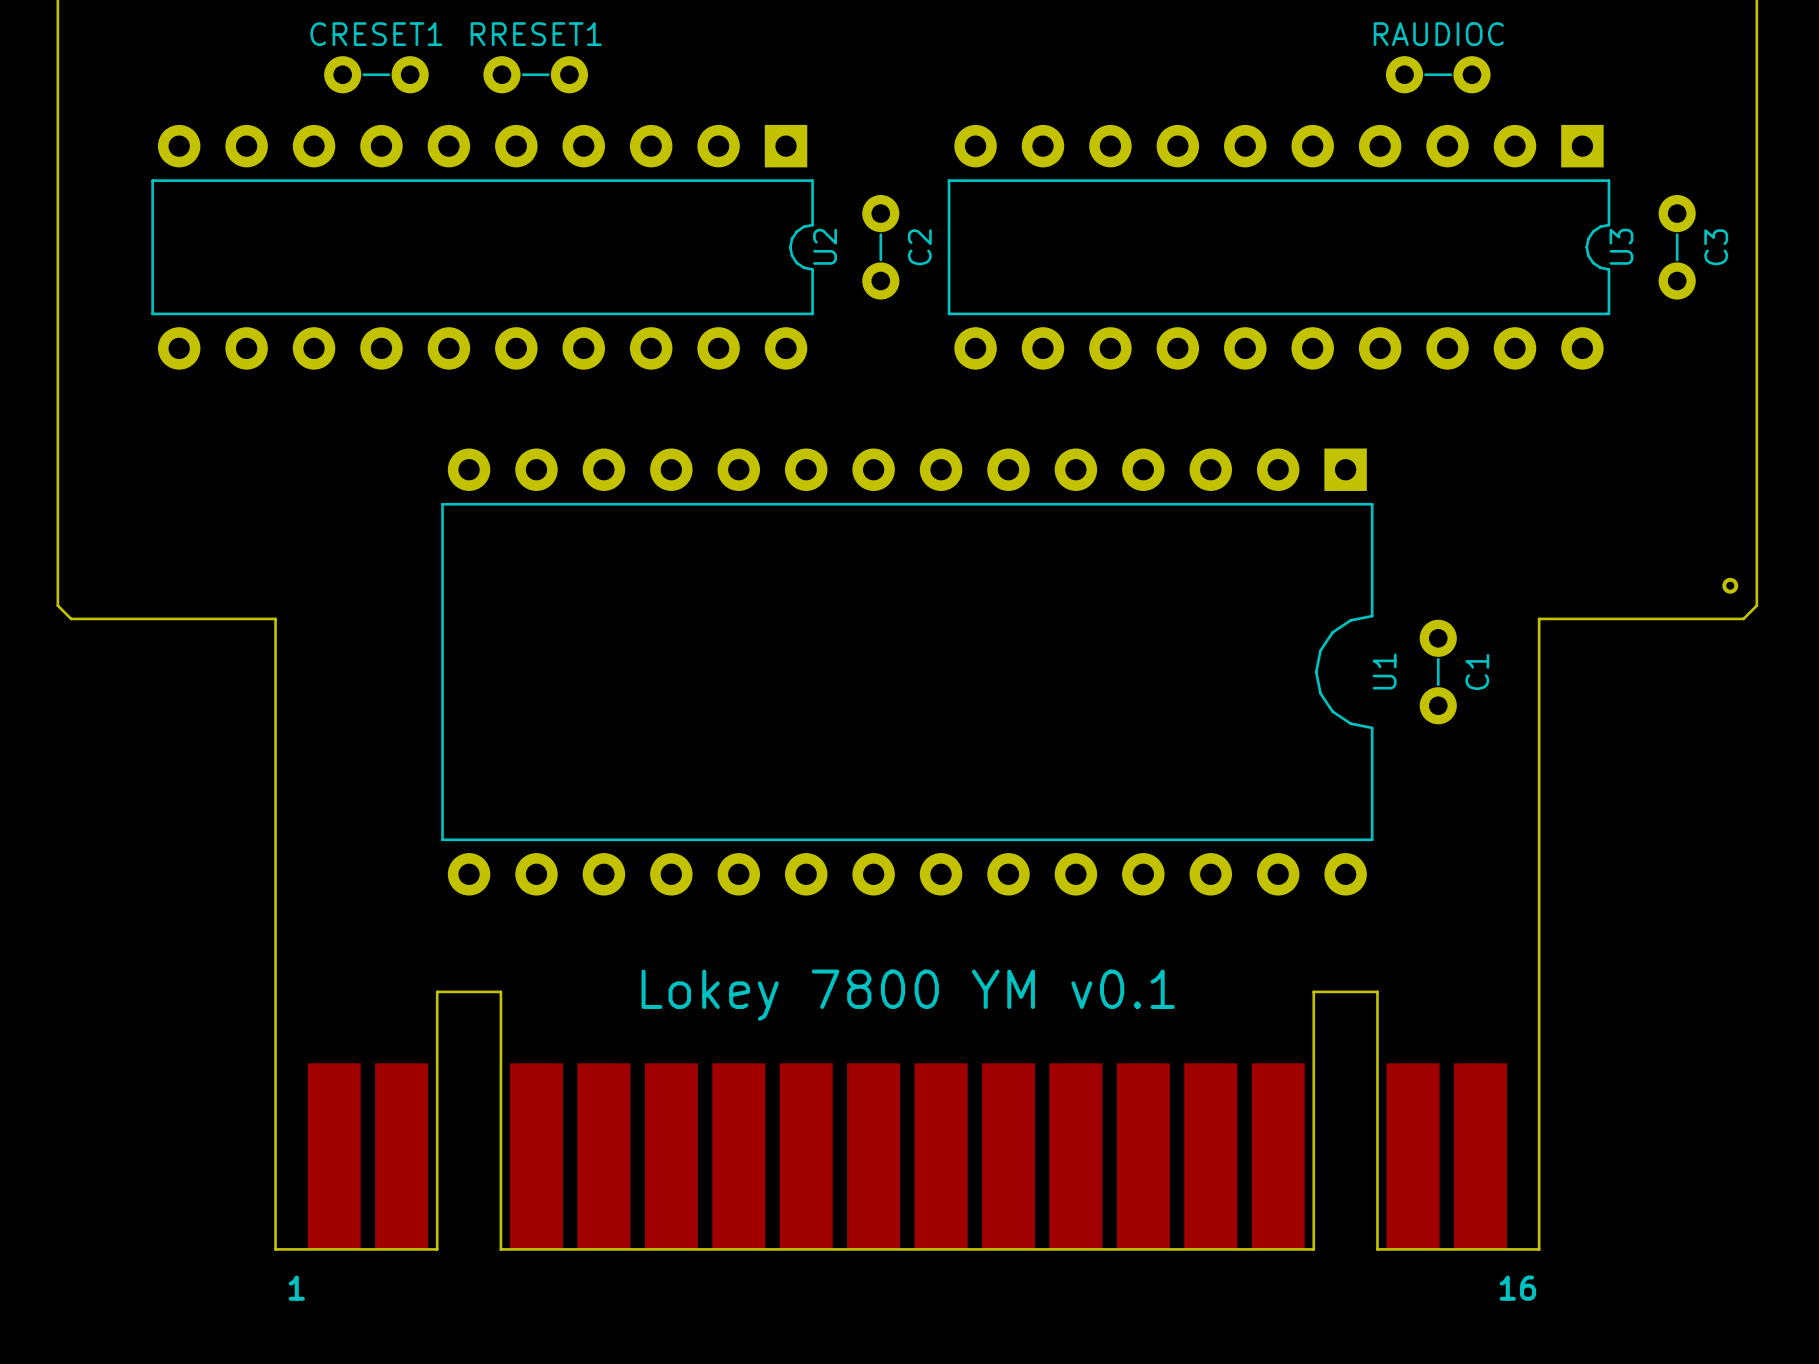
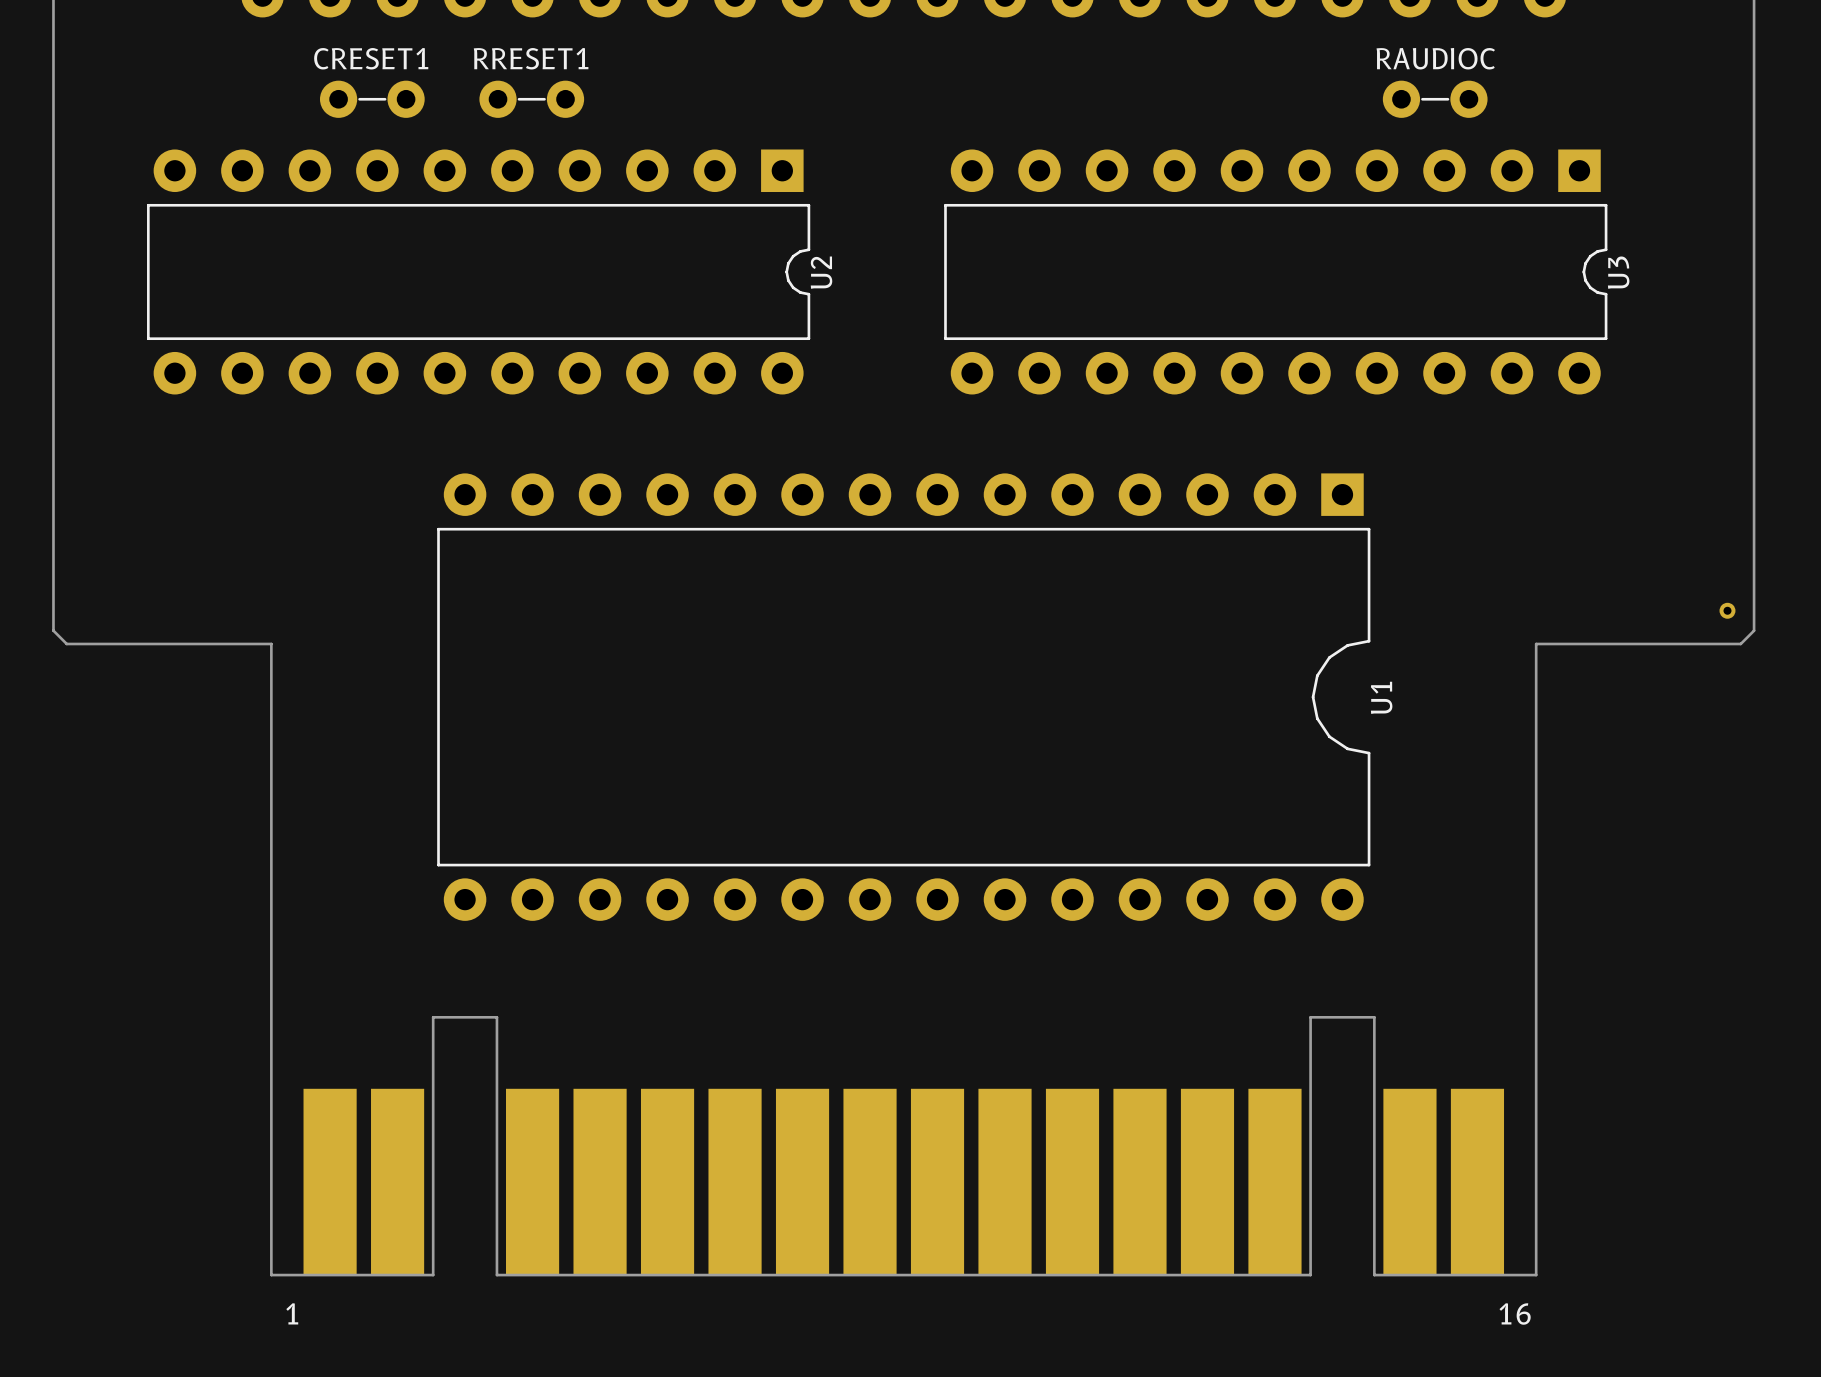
C2: (880, 247) -> none
C3: (1677, 247) -> none
C1: (1438, 672) -> none
text: Lokey 7800 YM v0.1 (908, 995) -> none

